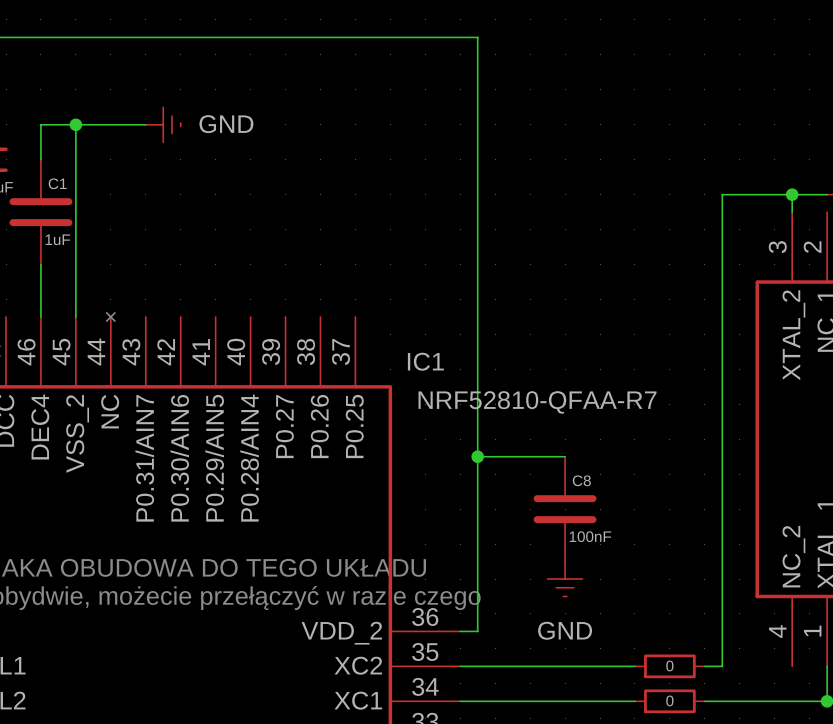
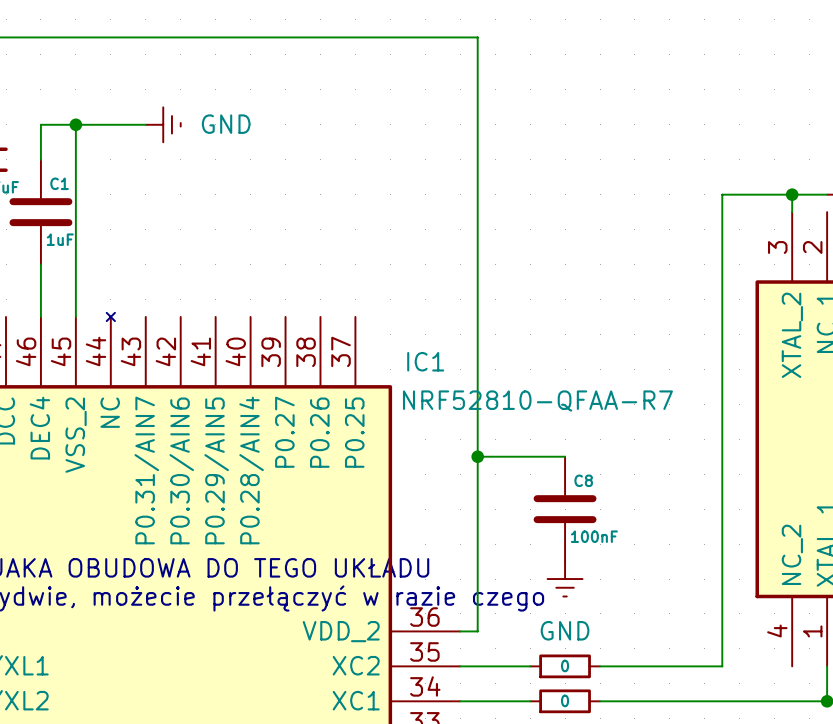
wire: (530, 666) (600, 666) -> (634, 666) (704, 666)
part: none -> 0 (565, 666)
part: 0 (669, 666) -> none
wire: (530, 701) (600, 701) -> (634, 701) (704, 701)
part: none -> 0 (565, 701)
part: 0 (669, 701) -> none

